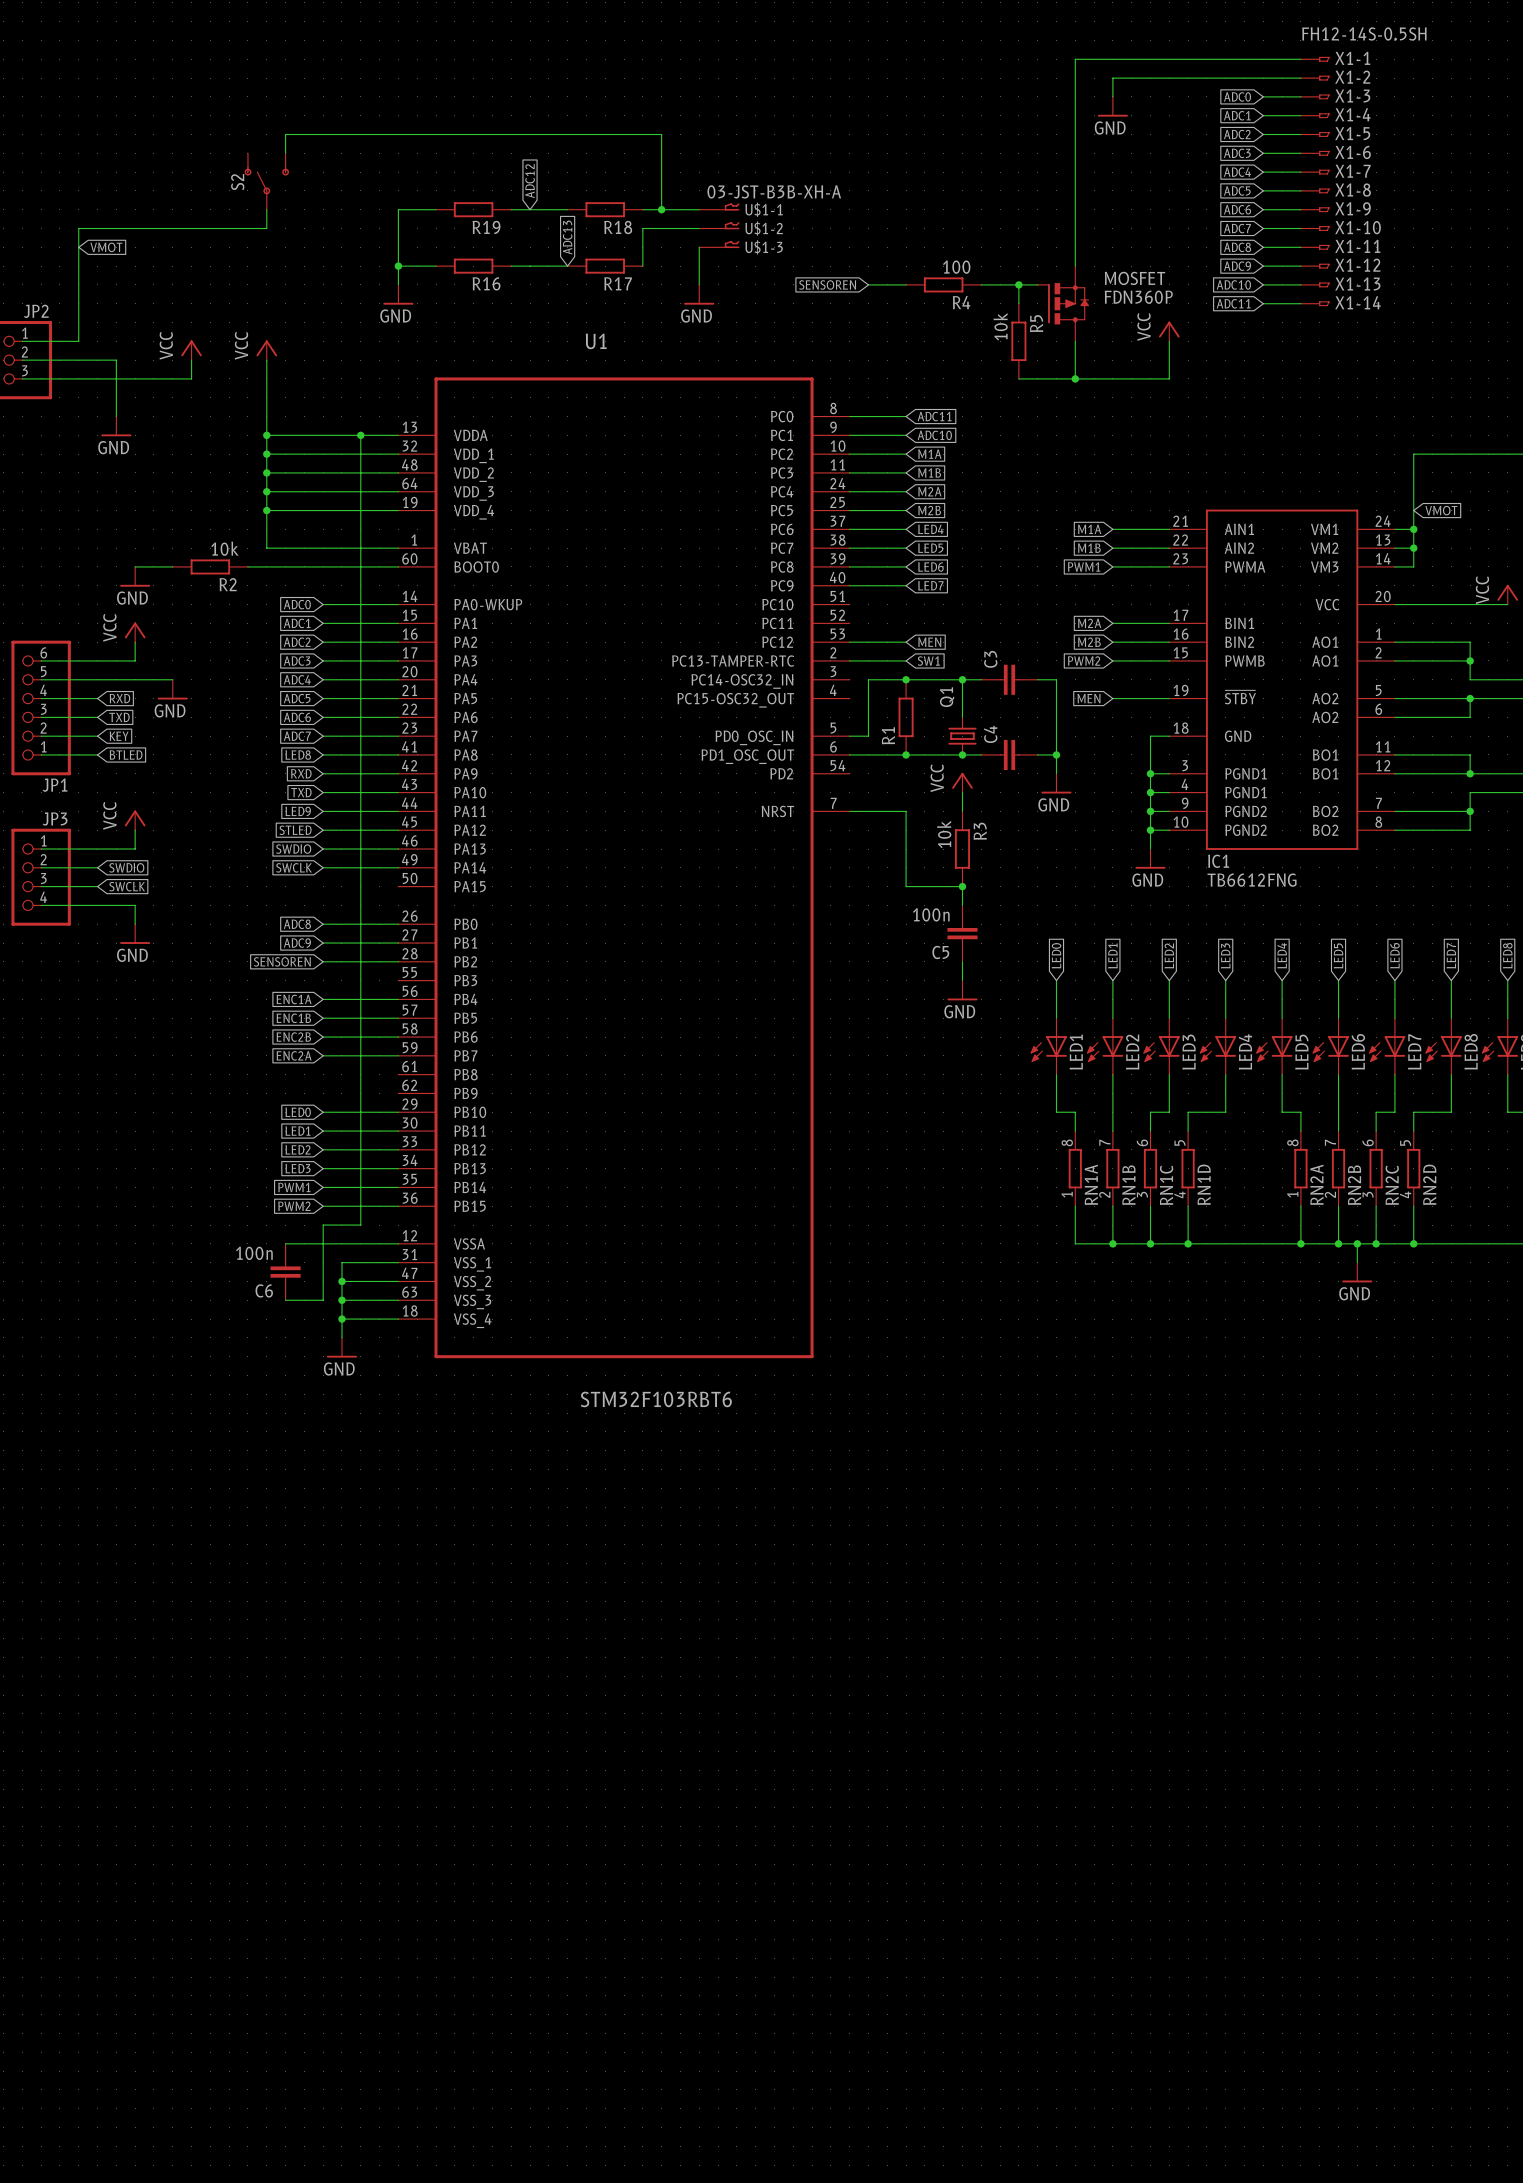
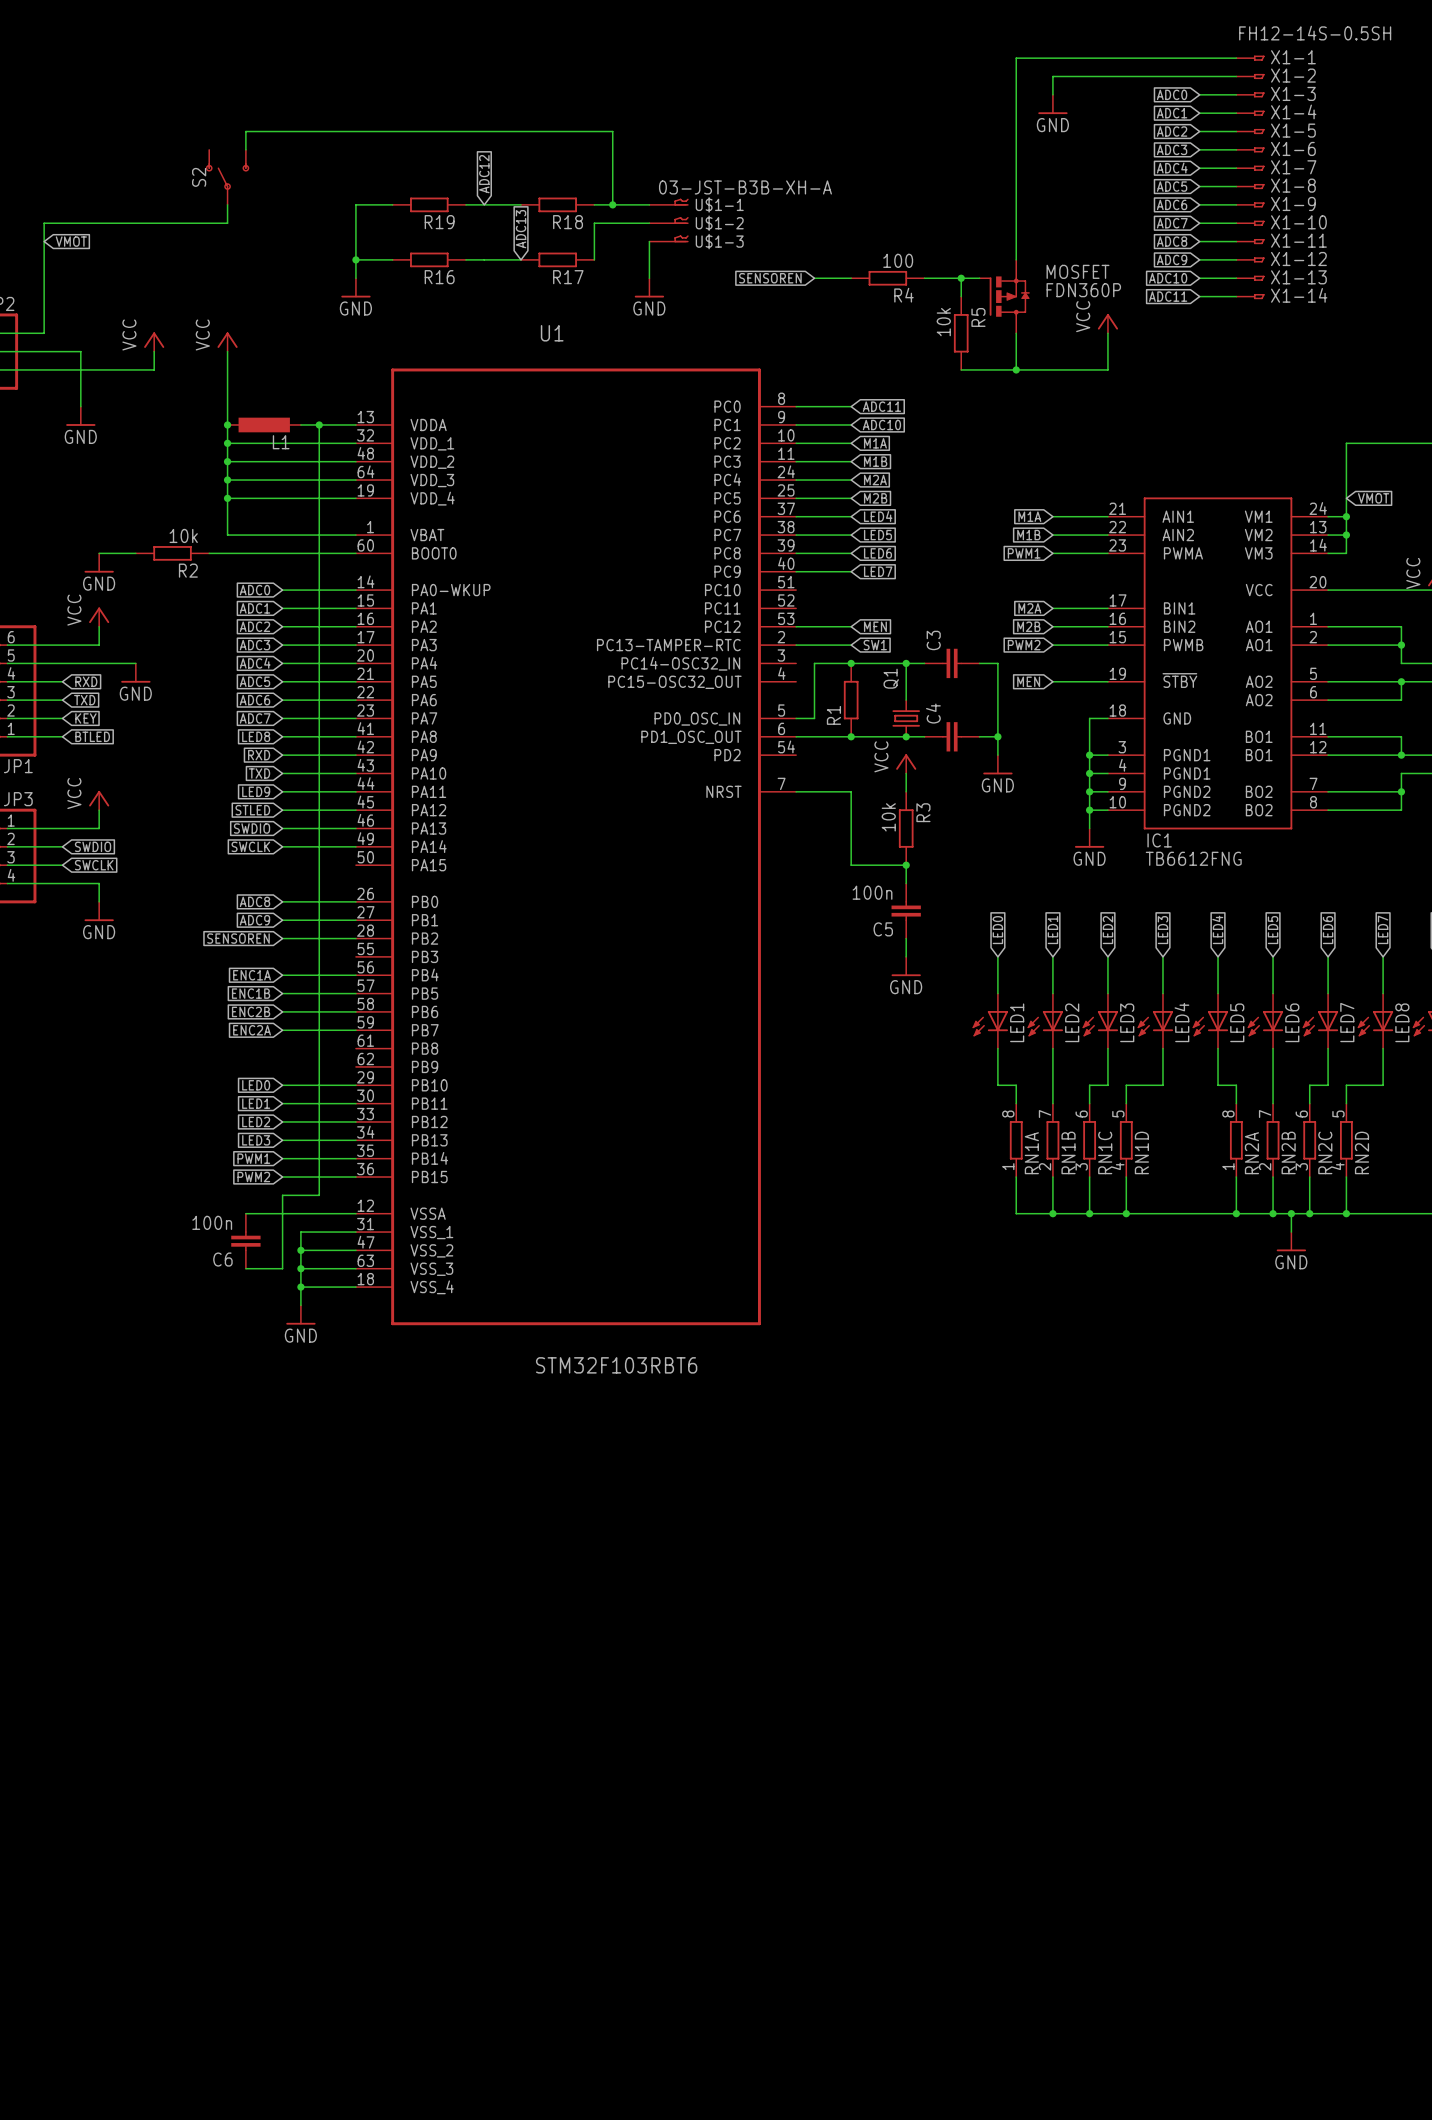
L1: none -> (264, 424)

